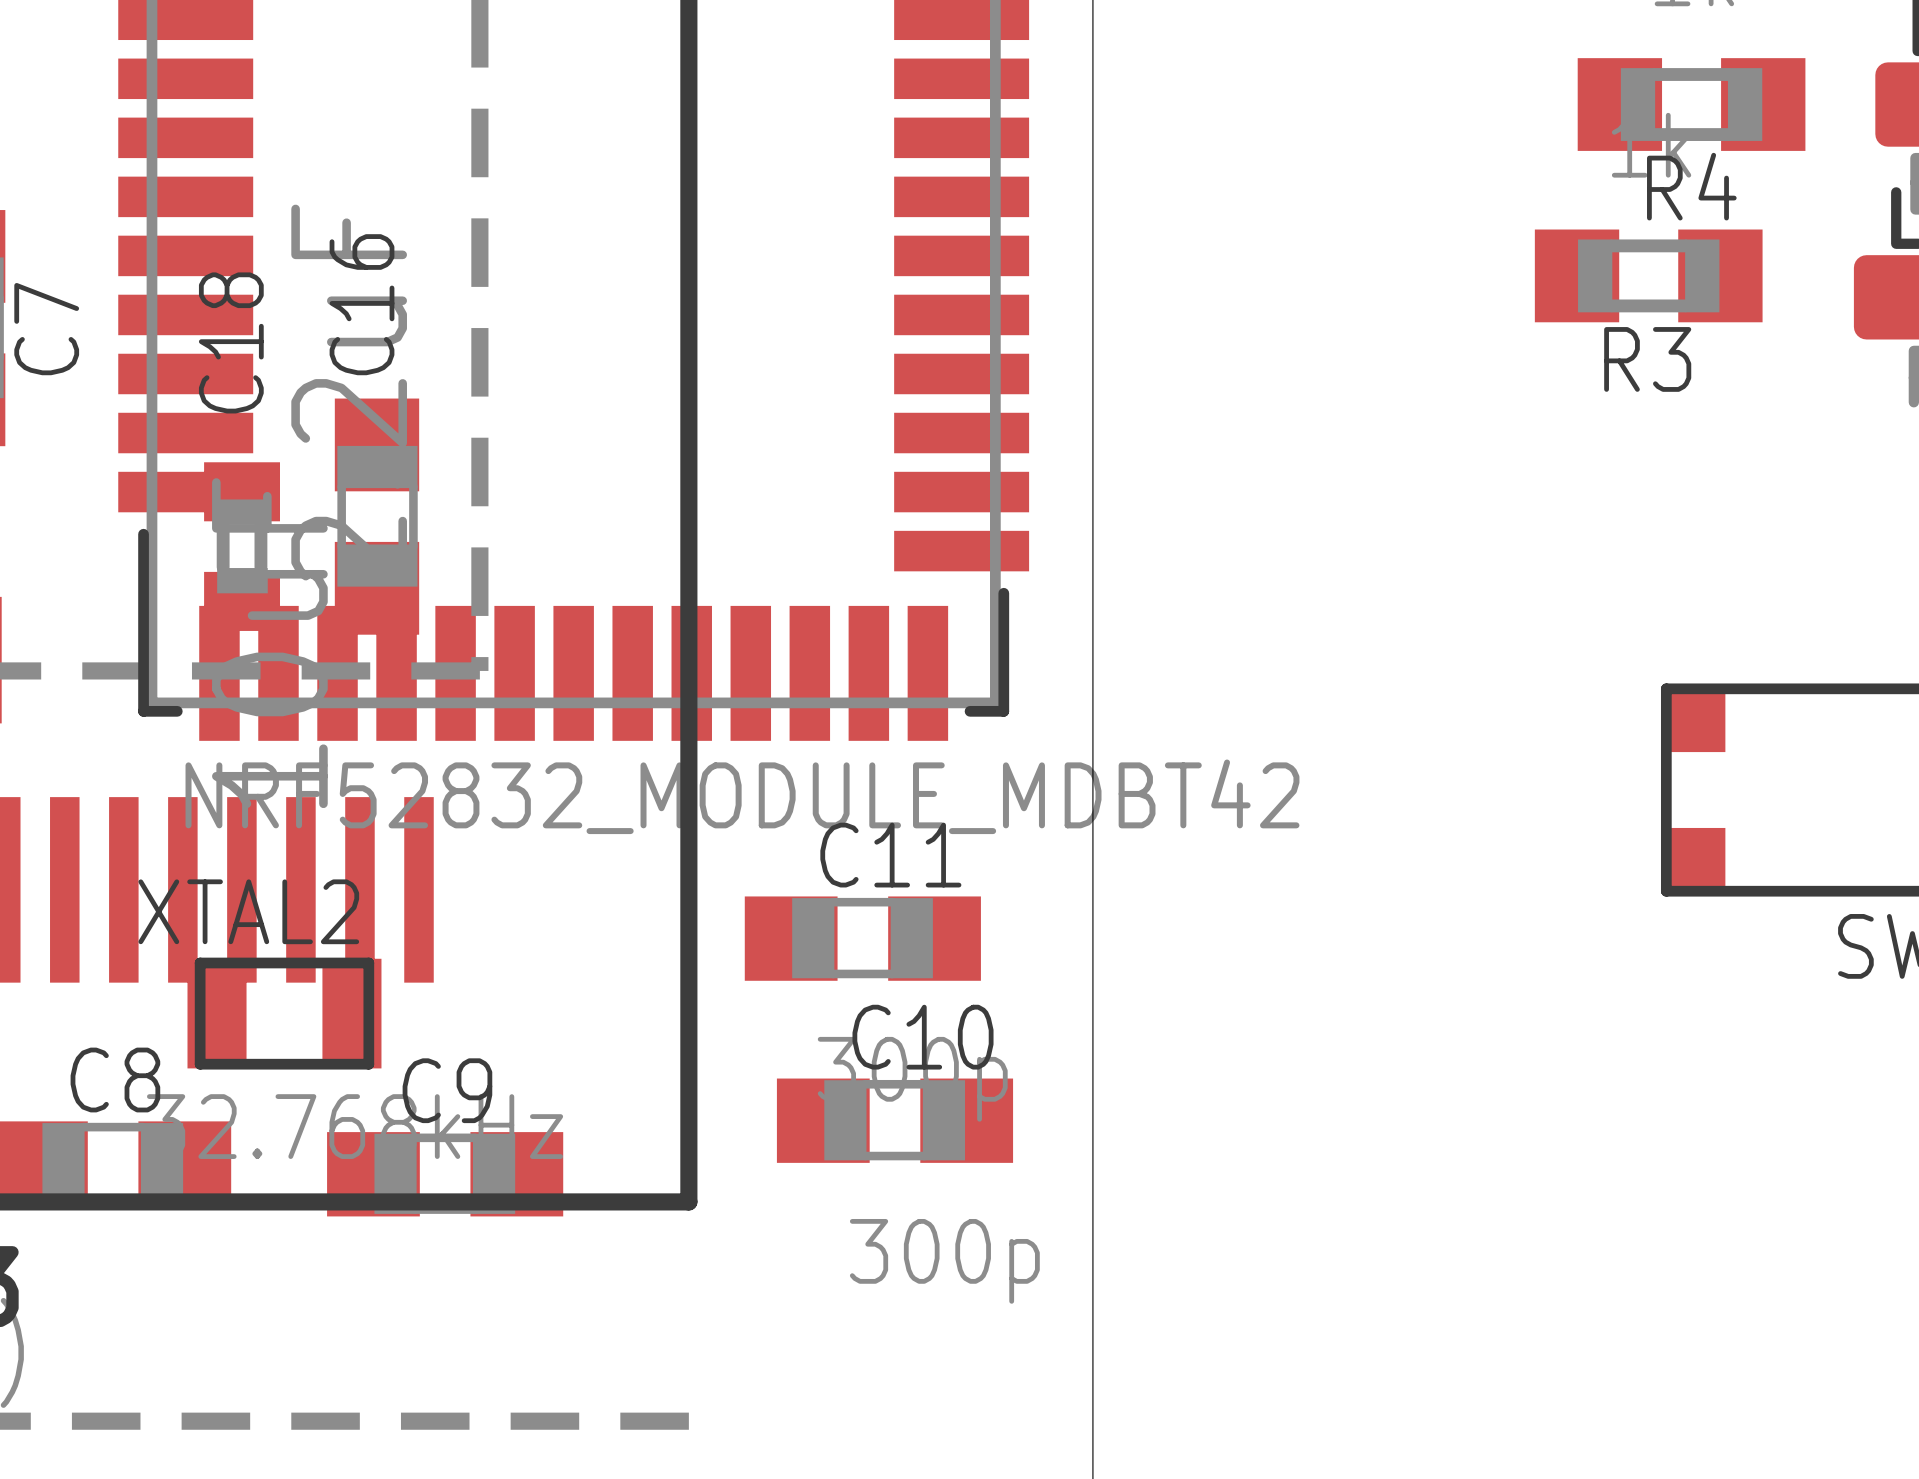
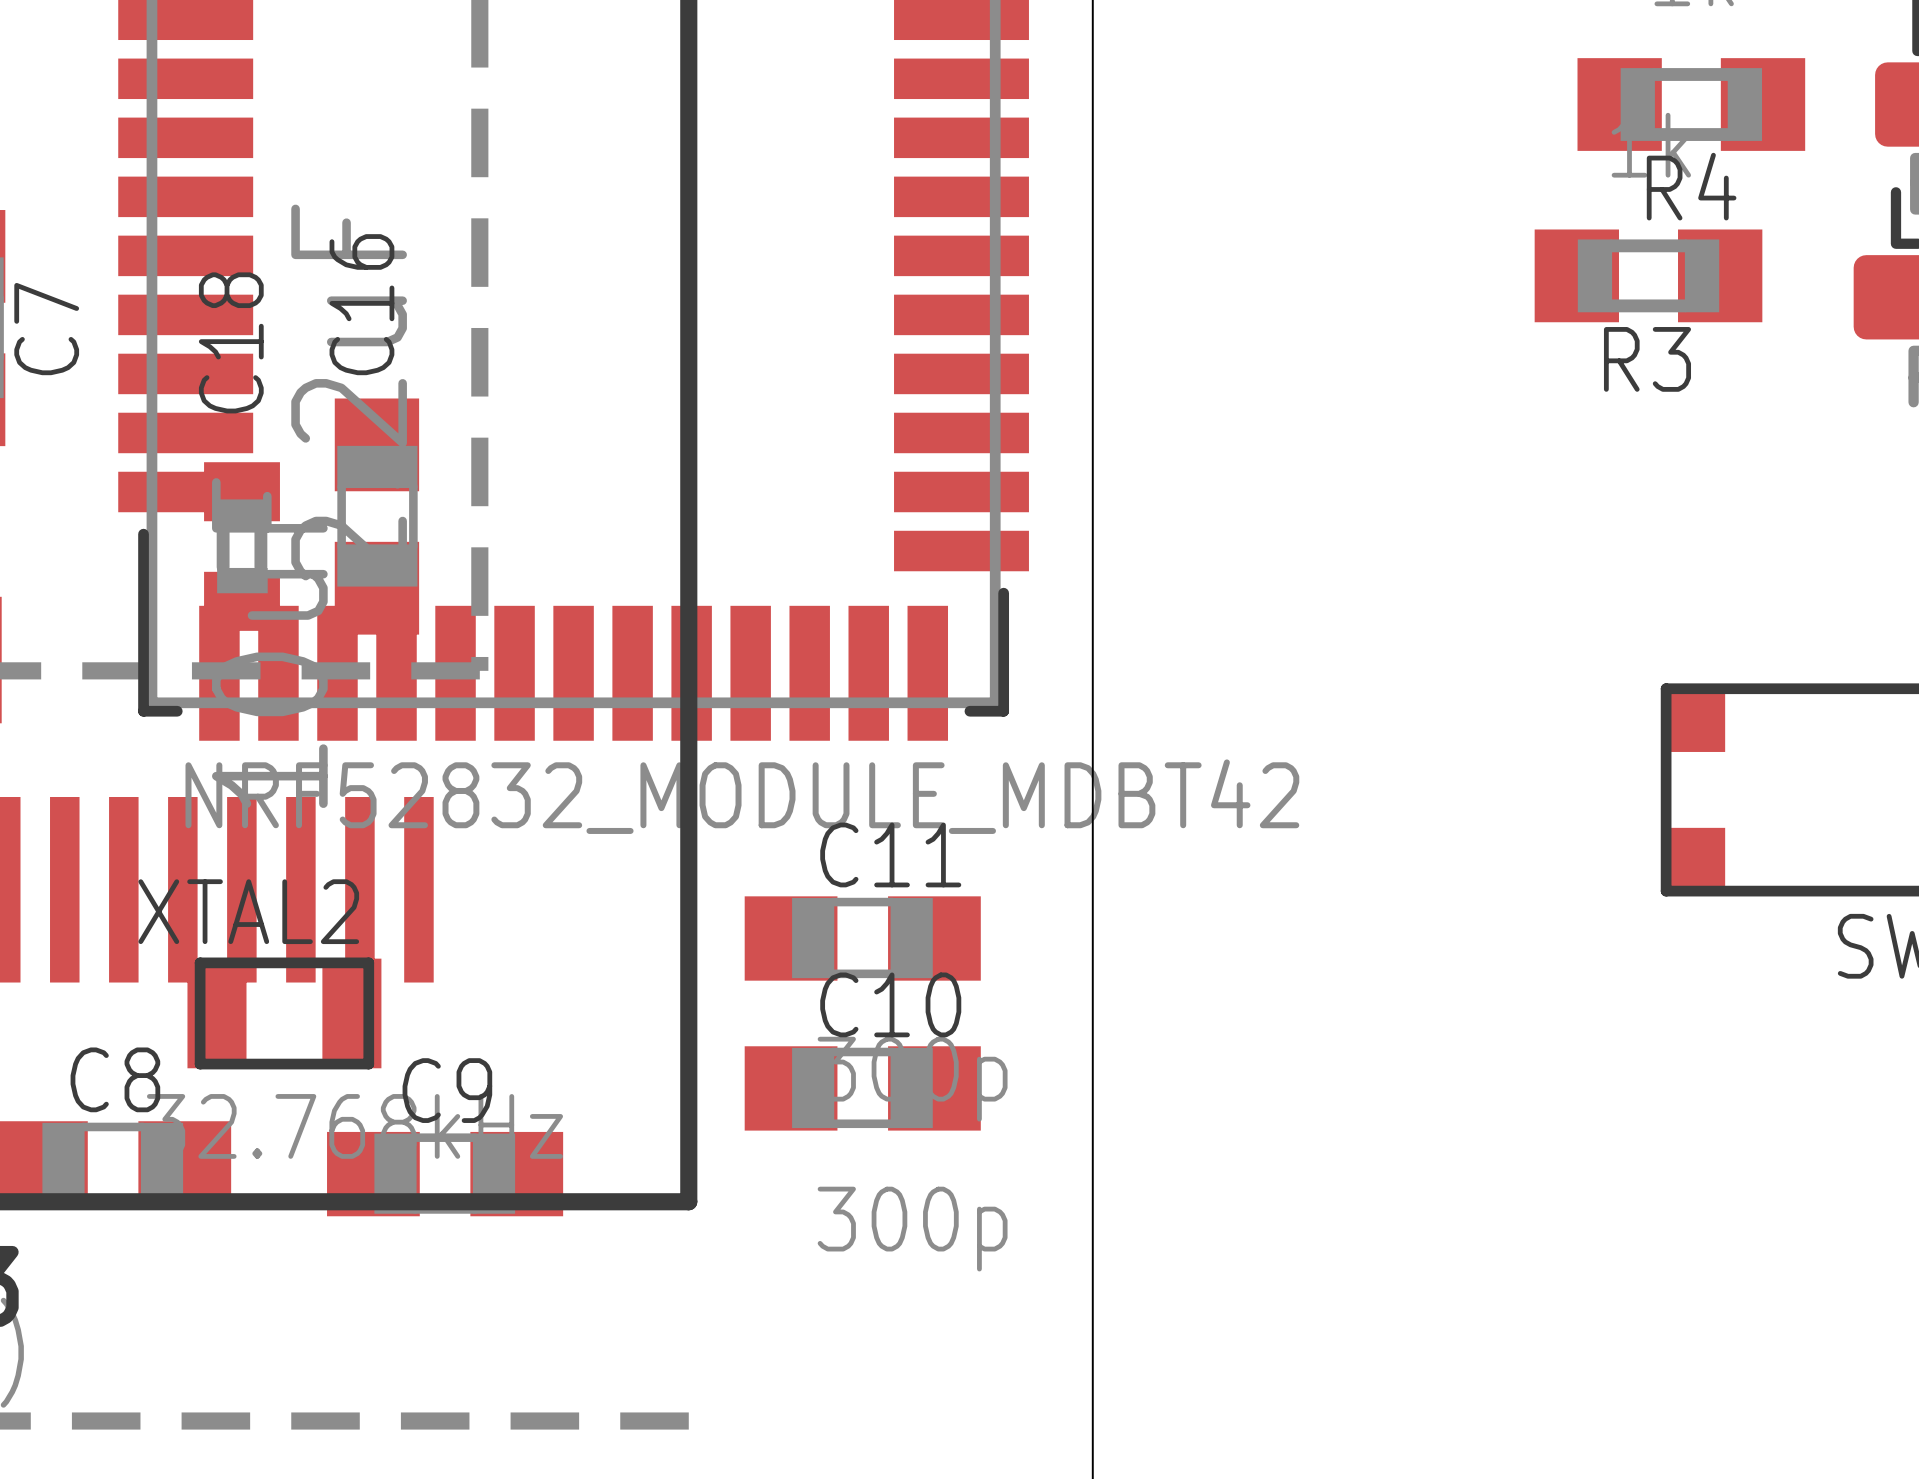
C10 position: (894, 1120) -> (862, 1088)

